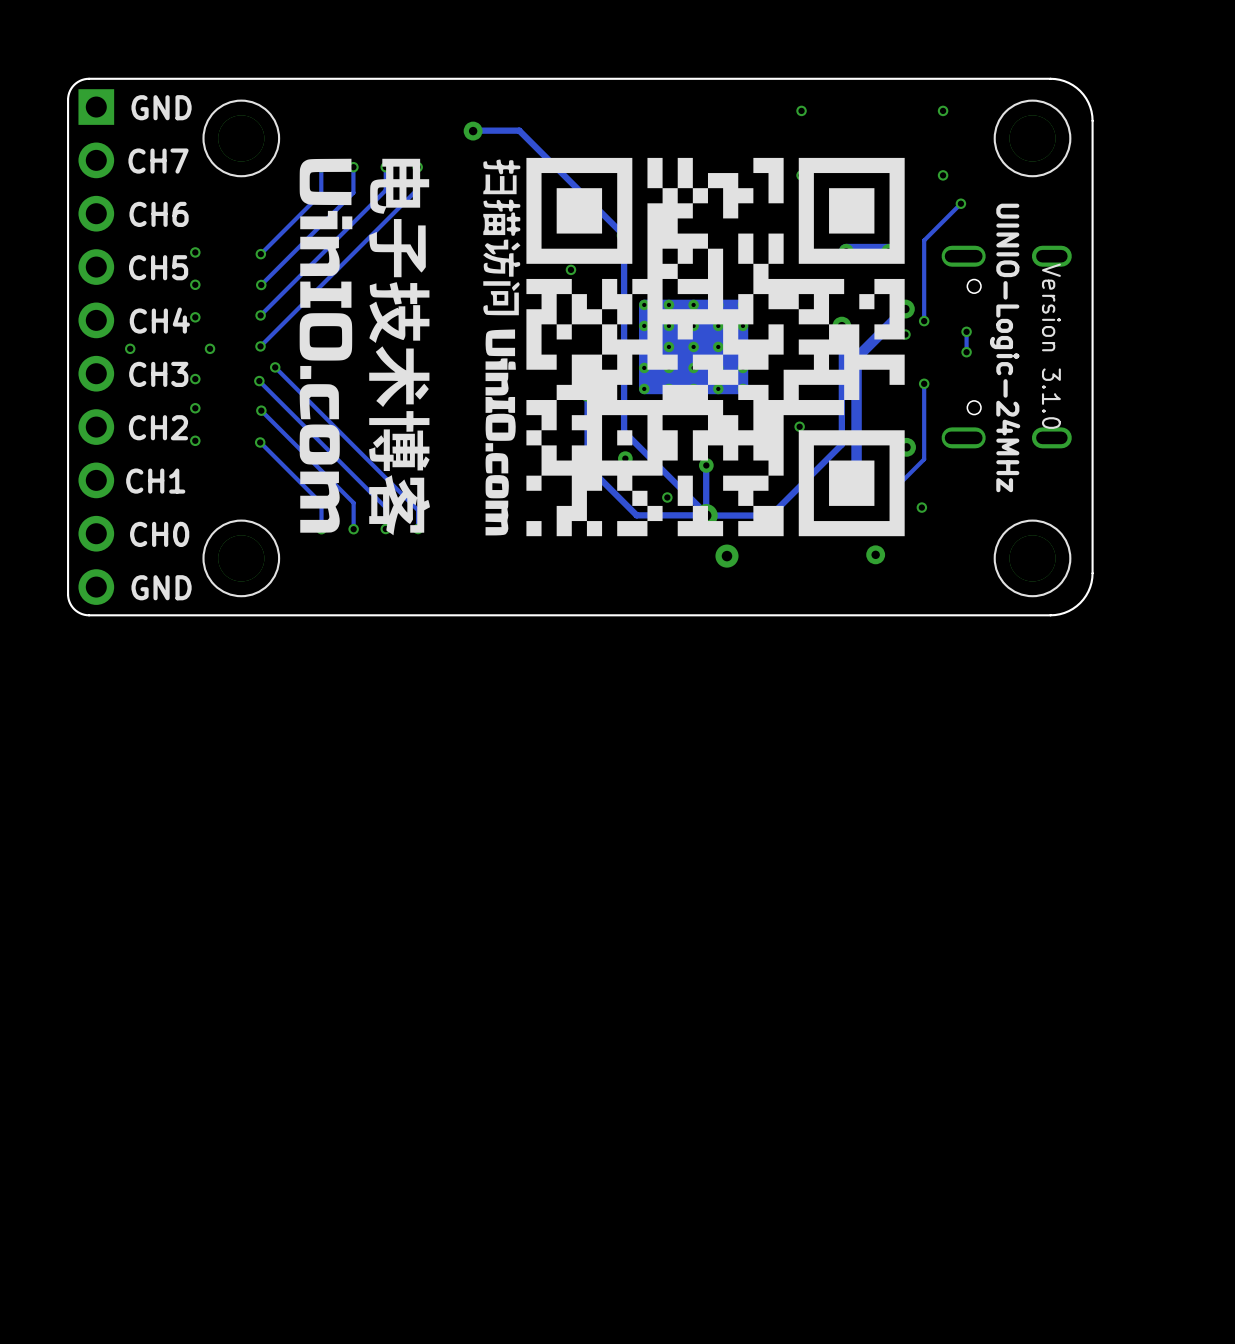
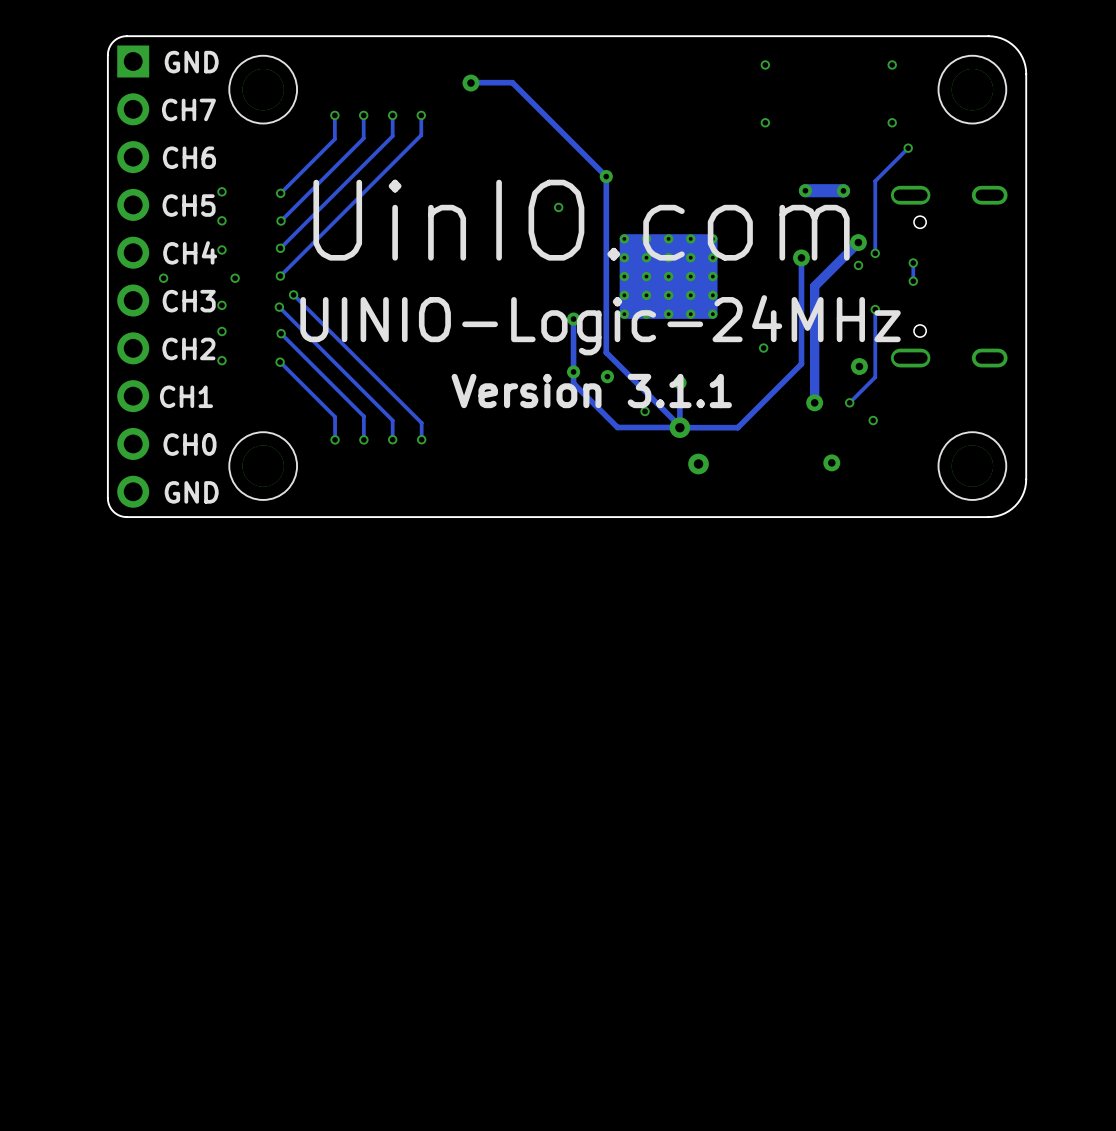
drawing: [483, 157, 905, 537] -> none
drawing: [299, 158, 430, 536] -> none
text: none -> UinIO.com (581, 220)
text: Version 3.1.0 (1051, 346) -> none
text: UINIO-Logic-24MHz (1005, 347) -> none
text: none -> UINIO-Logic-24MHz (600, 325)
text: none -> Version 3.1.1 (591, 391)

